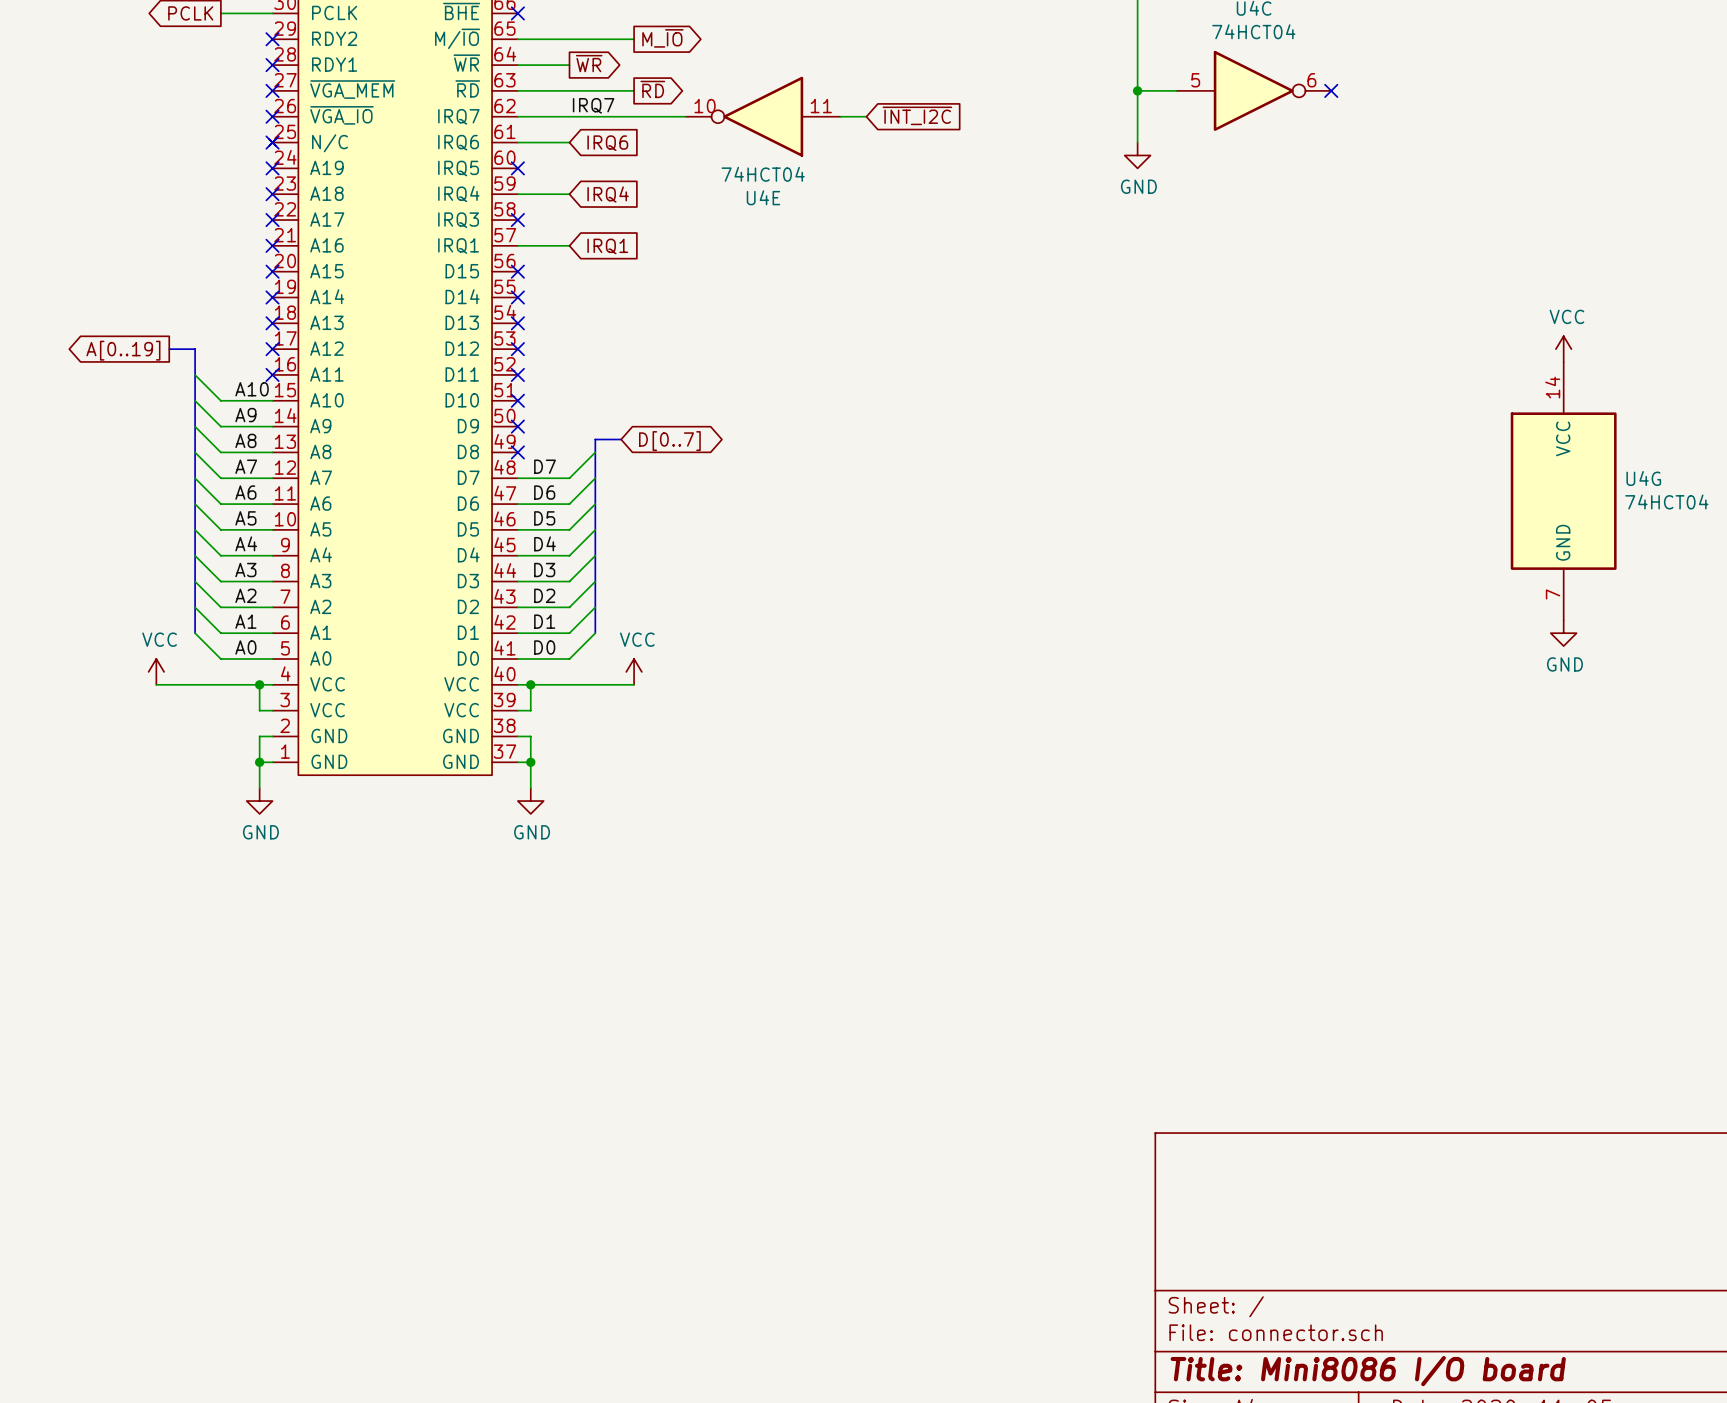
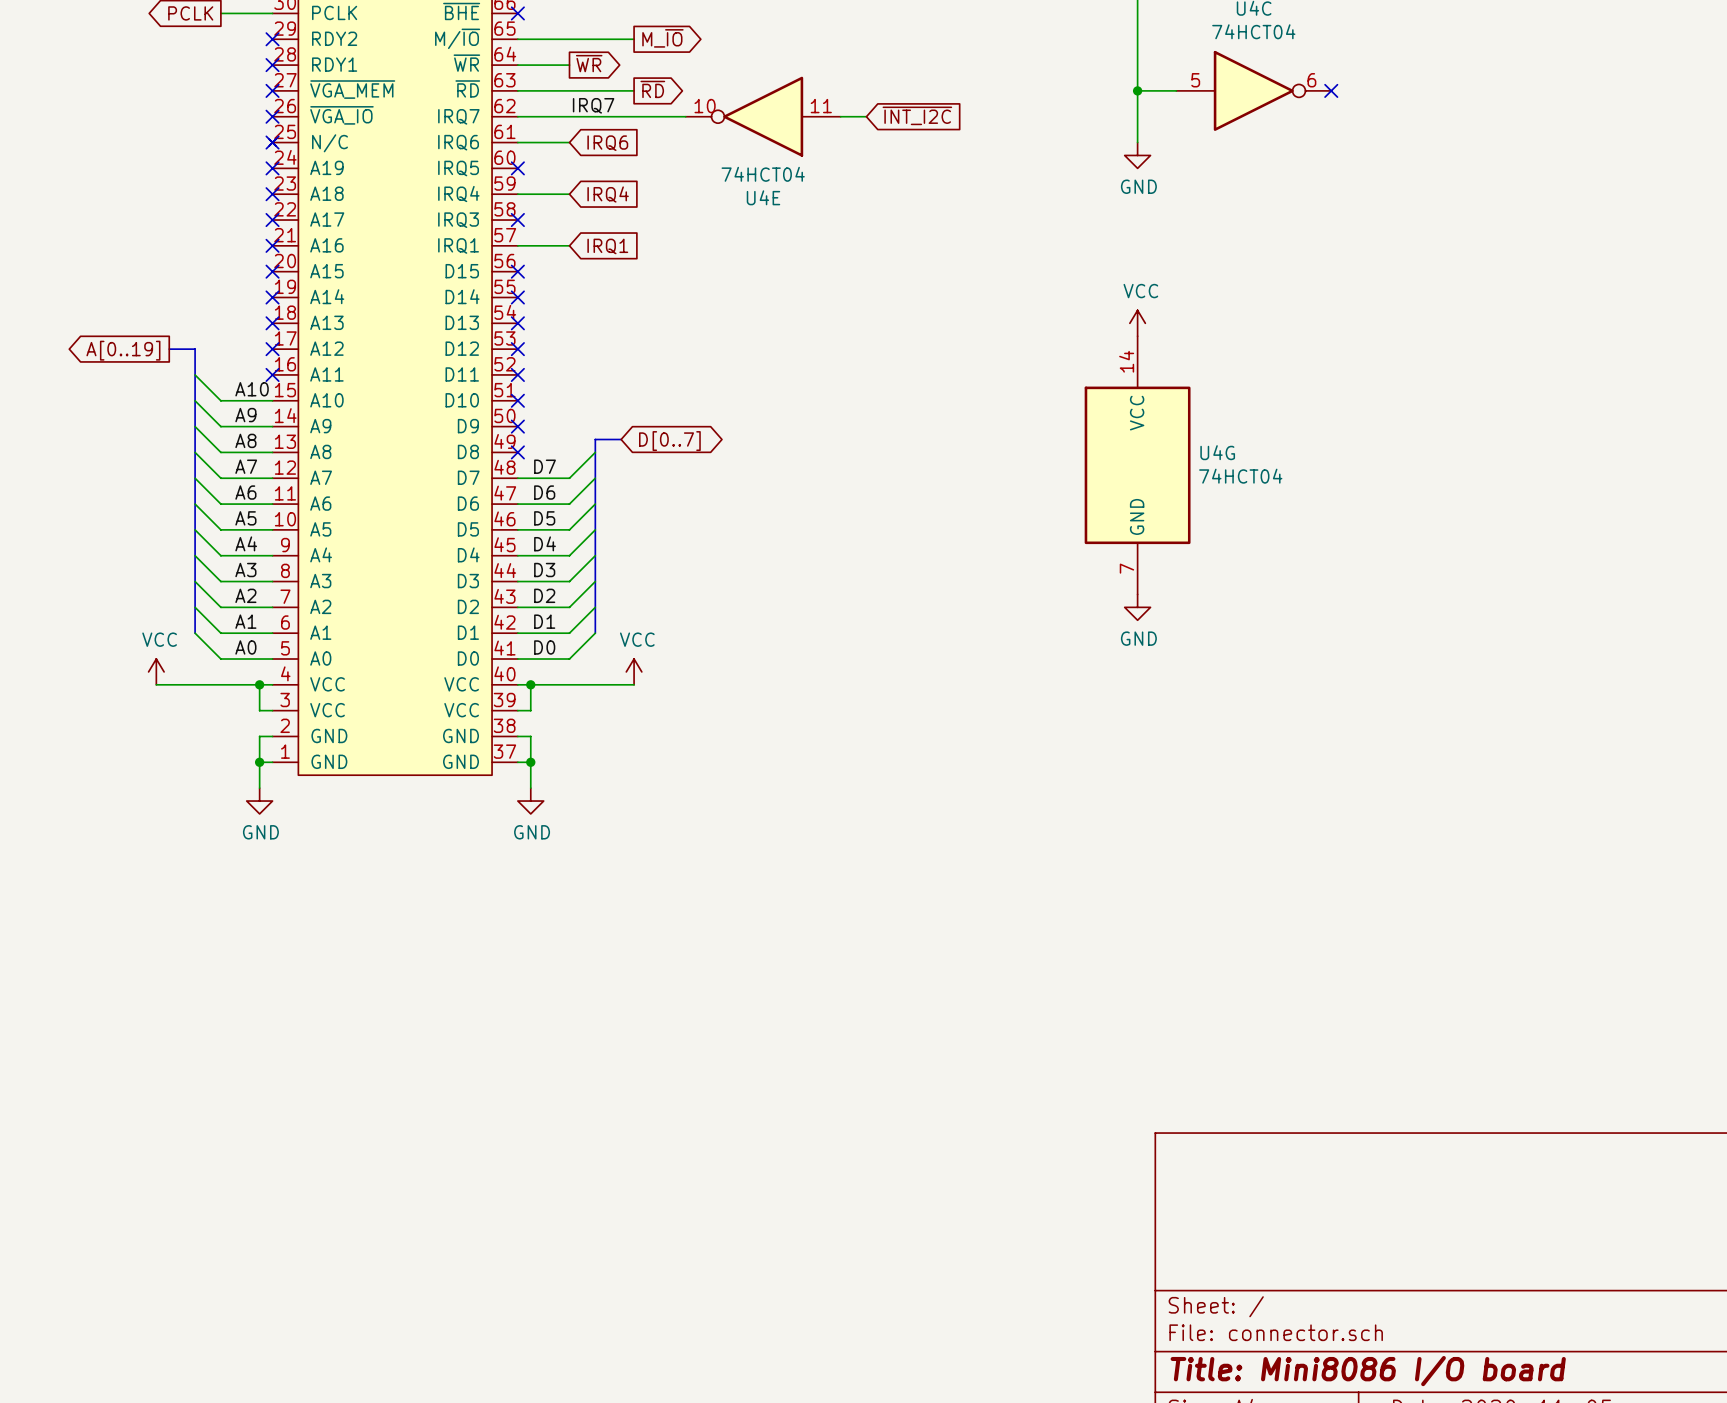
power symbol: none -> VCC (1137, 323)
power symbol: VCC (1563, 349) -> none
U4G position: (1563, 491) -> (1137, 465)
power symbol: none -> GND (1137, 607)
power symbol: GND (1563, 633) -> none

